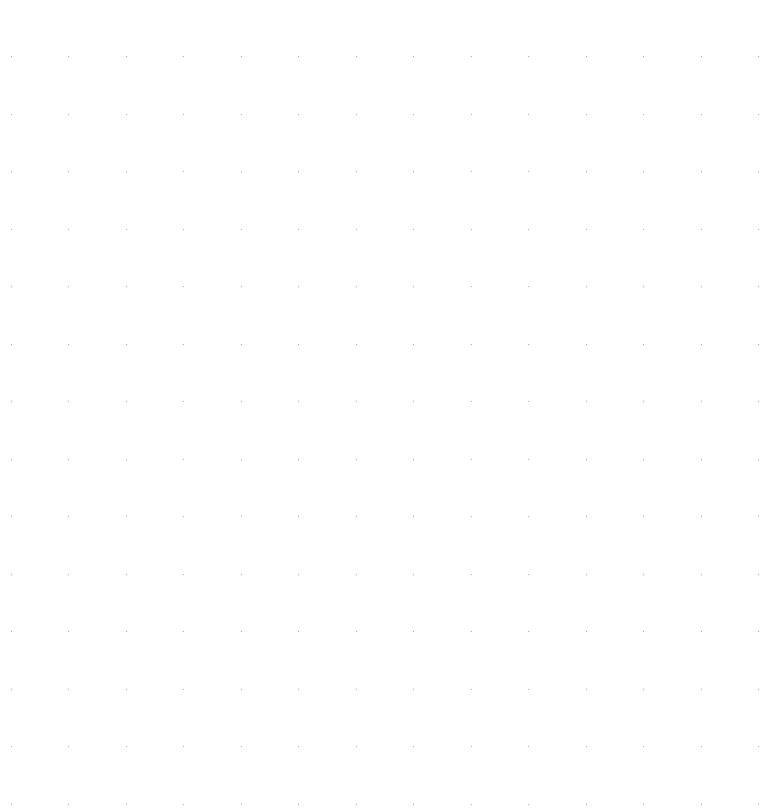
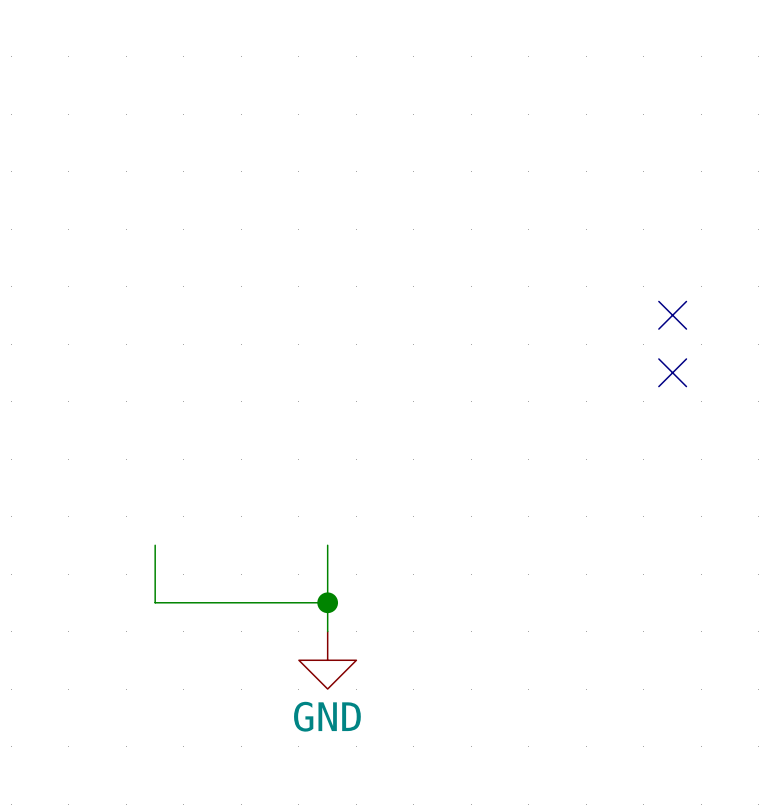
no-connect mark: none -> (672, 315)
no-connect mark: none -> (672, 372)
wire: none -> (155, 545) (155, 602) (327, 602)
wire: none -> (327, 545) (327, 631)
junction: none -> (327, 602)
power symbol: none -> GND (327, 660)

